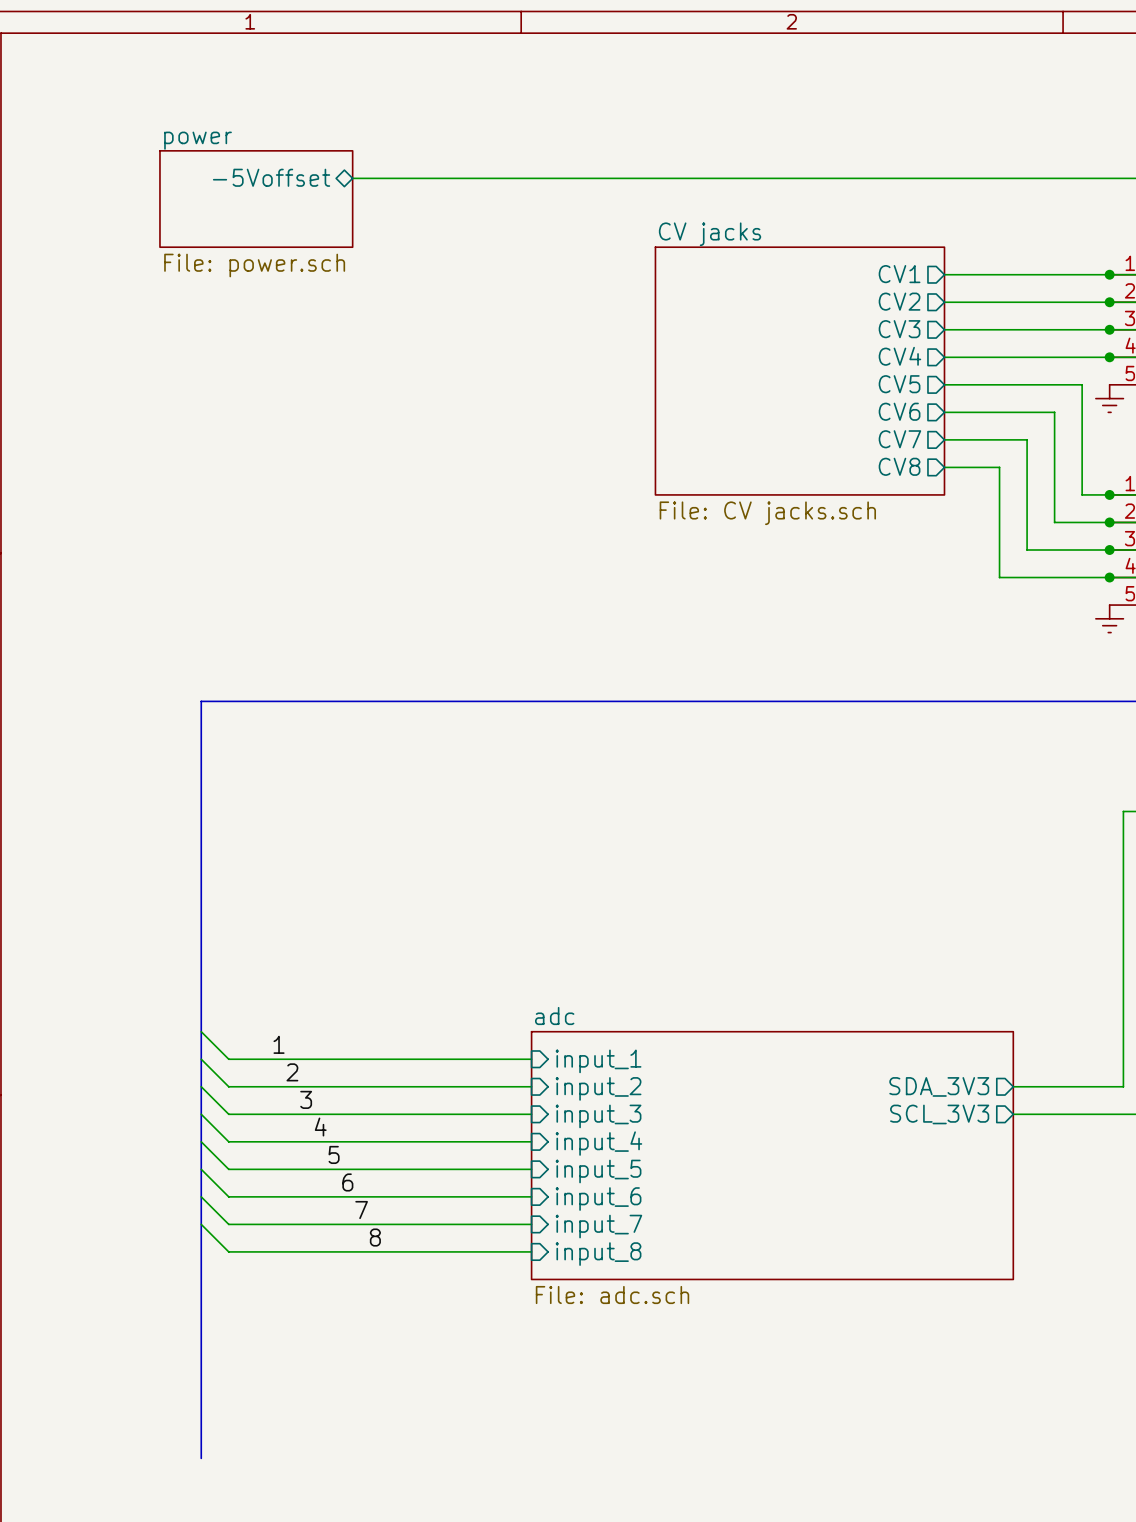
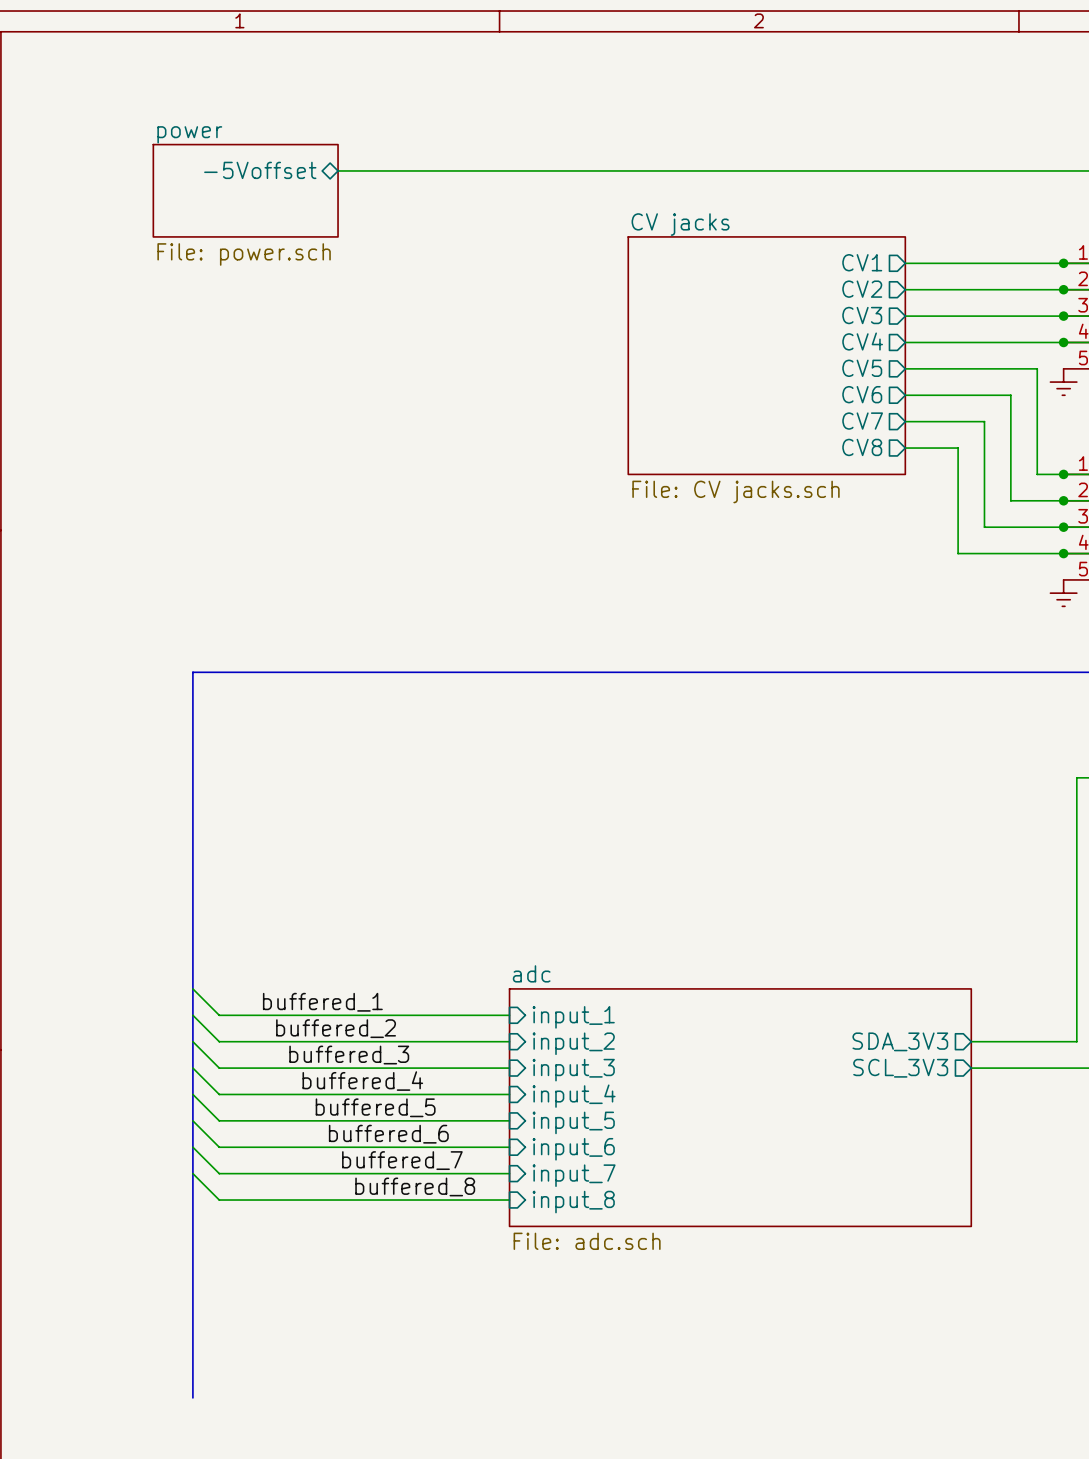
label: 1 (279, 1044) -> buffered_1 (322, 1002)
label: 2 (292, 1072) -> buffered_2 (336, 1028)
label: 3 (306, 1099) -> buffered_3 (349, 1055)
label: 4 (320, 1127) -> buffered_4 (362, 1081)
label: 5 (334, 1154) -> buffered_5 (375, 1107)
label: 6 (347, 1182) -> buffered_6 (388, 1134)
label: 7 (361, 1210) -> buffered_7 (402, 1160)
label: 8 (375, 1237) -> buffered_8 (415, 1186)

